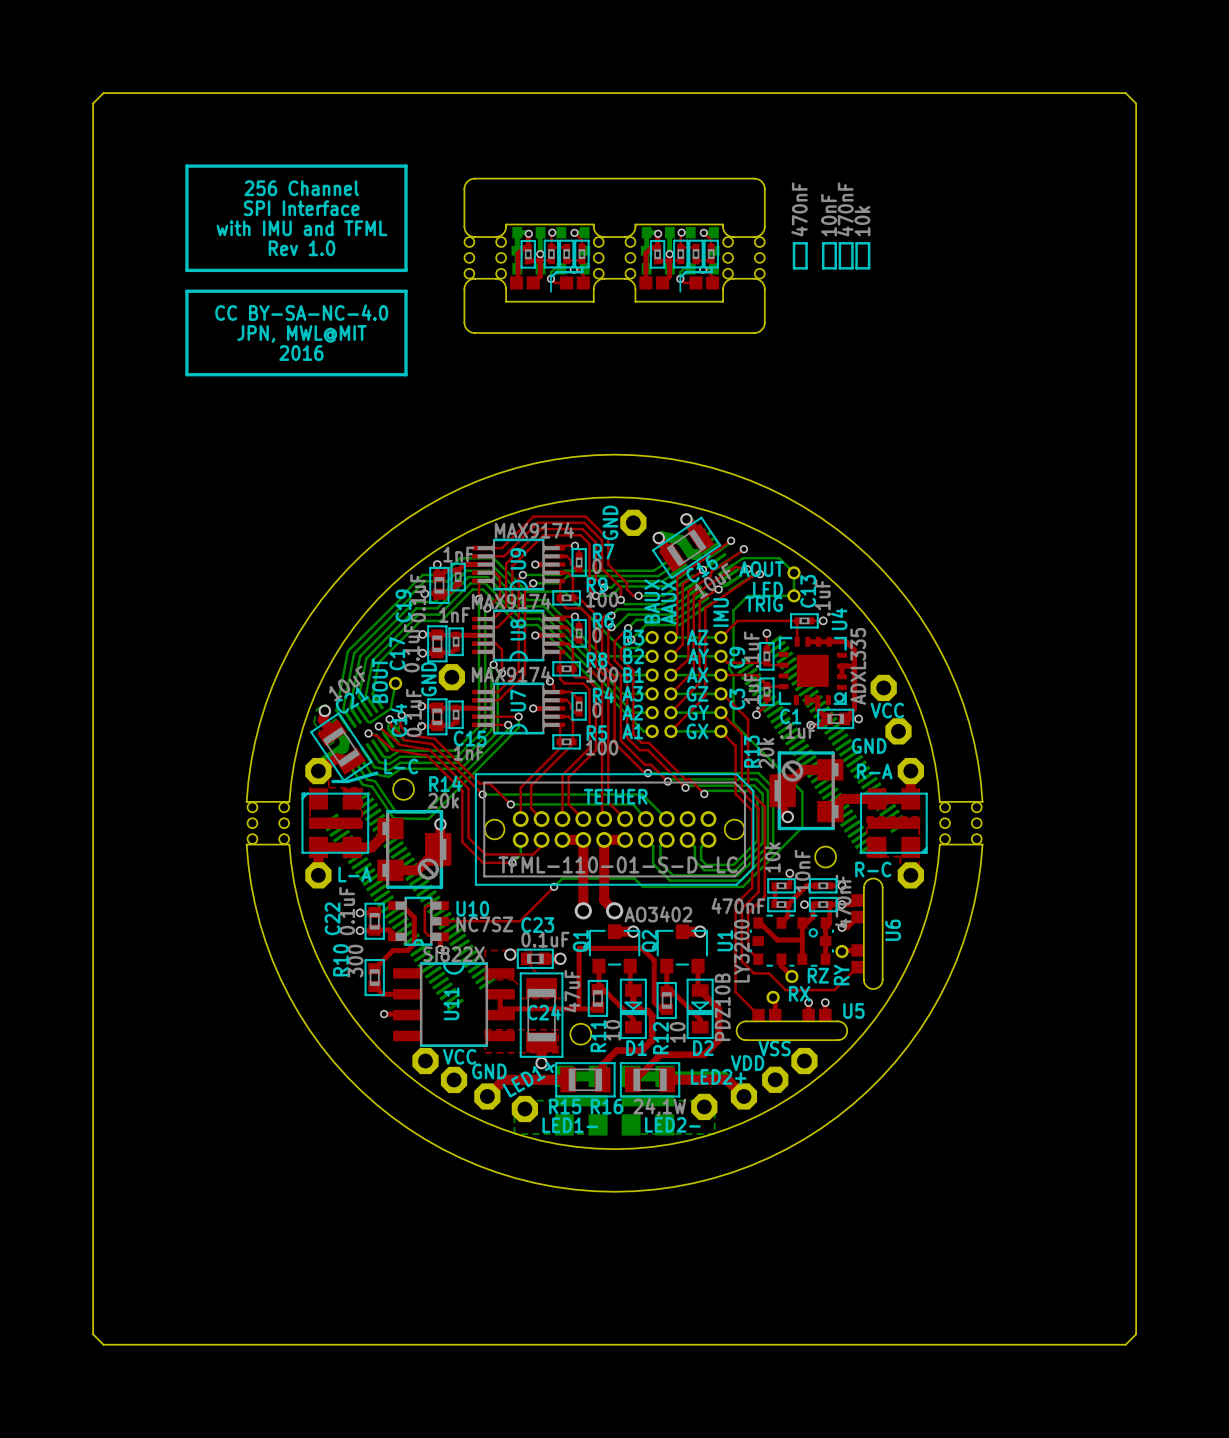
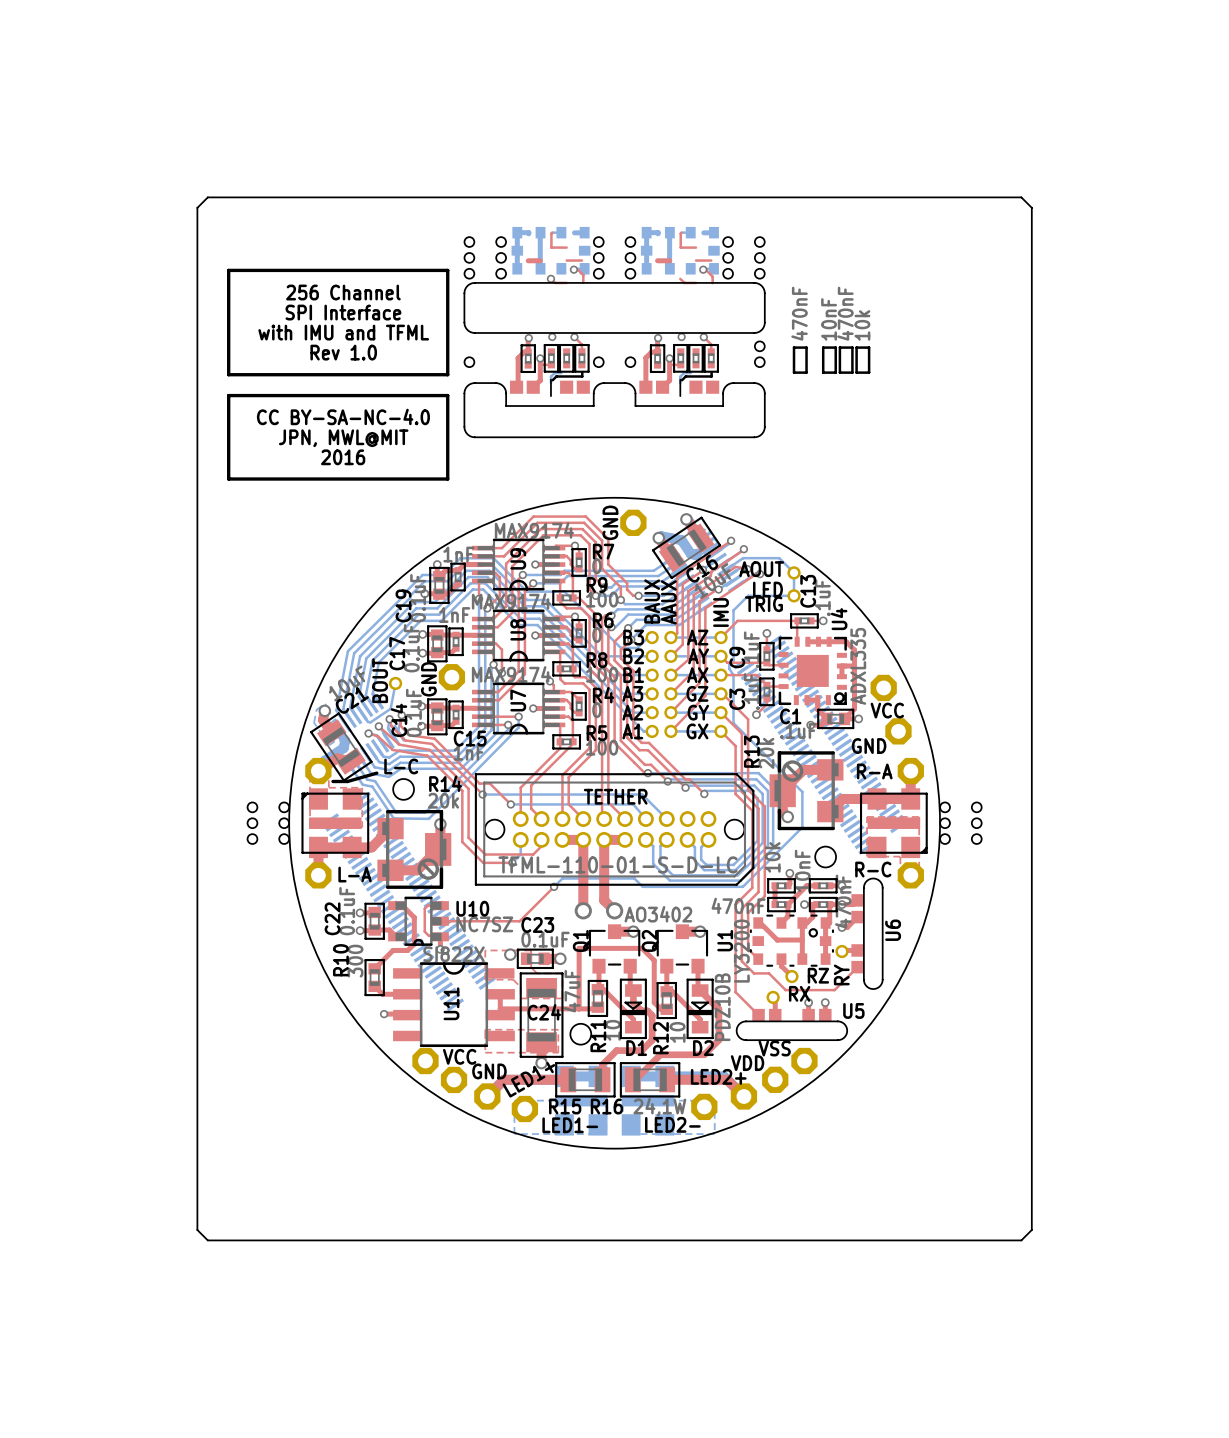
board edge: (103, 93) (93, 103) (93, 1334) (103, 1344) (1125, 1344) (1136, 1334) (1136, 103) (1125, 93) (103, 93) -> (207, 197) (197, 207) (197, 1229) (207, 1240) (1021, 1240) (1031, 1229) (1031, 207) (1021, 197) (207, 197)
board edge: (474, 178) (755, 178) (761, 181) (764, 187) (764, 227) (762, 232) (757, 236) (733, 237) (725, 232) (723, 224) (635, 224) (634, 231) (629, 236) (604, 237) (595, 232) (593, 224) (506, 224) (504, 231) (499, 236) (473, 236) (467, 233) (464, 227) (464, 189) (467, 181) (474, 178) -> none
text position: 256 Channel (301, 188) -> 256 Channel (343, 292)
text position: SPI Interface (301, 208) -> SPI Interface (343, 312)
text position: with IMU and TFML (301, 228) -> with IMU and TFML (343, 332)
via: (552, 232) -> none
top track: (574, 232) (581, 240) (581, 247) -> (574, 337) (581, 344) (581, 351)
via: (574, 232) -> none
via: (681, 232) -> none
top track: (703, 232) (711, 240) (711, 247) -> (703, 337) (711, 344) (711, 351)
via: (703, 232) -> none
top track: (528, 233) (528, 247) (524, 247) (518, 253) (516, 282) -> (528, 338) (528, 352) (524, 352) (518, 358) (516, 387)
via: (528, 233) -> none
top track: (658, 233) (657, 247) (651, 247) (645, 253) (645, 282) -> (658, 338) (657, 352) (651, 352) (645, 357) (645, 387)
via: (658, 233) -> none
line: (794, 243) (794, 268) (806, 268) (806, 243) (794, 243) -> (794, 347) (794, 372) (806, 372) (806, 347) (794, 347)
line: (823, 243) (835, 243) (835, 268) (823, 268) (823, 243) -> (823, 347) (835, 347) (835, 372) (823, 372) (823, 347)
line: (839, 243) (852, 243) (852, 268) (839, 268) (839, 243) -> (839, 347) (852, 347) (852, 372) (839, 372) (839, 347)
line: (856, 243) (869, 243) (869, 268) (856, 268) (856, 243) -> (856, 347) (869, 347) (869, 372) (856, 372) (856, 347)
text position: Rev 1.0 (301, 248) -> Rev 1.0 (343, 352)
part: (528, 254) -> none
via: (540, 254) -> none
part: (551, 254) -> none
part: (566, 254) -> none
part: (581, 254) -> none
part: 470nF (657, 254) -> none
via: (669, 254) -> none
part position: (680, 254) -> (680, 358)
part: 470nF (696, 254) -> none
part position: (711, 254) -> (711, 358)
top track: (551, 260) (540, 260) (540, 254) (540, 276) (533, 282) -> (551, 364) (540, 364) (540, 358) (540, 380) (533, 387)
top track: (680, 260) (669, 260) (669, 254) (669, 276) (662, 282) -> (680, 364) (669, 364) (669, 358) (669, 380) (662, 387)
bottom track: (561, 268) (554, 268) (550, 272) (550, 278) -> (561, 373) (554, 373) (550, 376) (550, 383)
line: (582, 268) (582, 272) (557, 272) -> (582, 372) (582, 376) (557, 376)
bottom track: (690, 268) (683, 268) (680, 272) (680, 278) -> (690, 373) (683, 373) (680, 376) (680, 383)
line: (711, 268) (711, 272) (686, 272) -> (711, 372) (711, 376) (686, 376)
line: (228, 270) (186, 270) (186, 166) (406, 166) (406, 270) -> (228, 270) (228, 374)
line: (556, 272) (552, 275) -> (556, 376) (552, 380)
line: (686, 272) (681, 275) -> (686, 376) (681, 380)
line: (550, 275) (550, 291) -> (550, 379) (550, 396)
line: (680, 275) (680, 291) -> (680, 379) (680, 396)
via: (680, 278) -> none
part: (516, 282) -> none
part: (533, 282) -> none
part: (566, 282) -> none
part: (583, 282) -> none
part: (645, 282) -> none
part: (662, 282) -> none
part: (695, 282) -> none
part: (712, 282) -> none
board edge: (464, 293) (466, 282) (474, 278) (497, 278) (502, 280) (506, 287) (506, 301) (593, 301) (594, 285) (597, 280) (604, 278) (626, 278) (631, 280) (635, 287) (635, 301) (723, 301) (723, 285) (727, 280) (733, 278) (758, 279) (764, 285) (764, 293) -> (464, 293) (467, 285) (474, 282) (754, 282) (761, 285) (764, 293)
text position: CC BY-SA-NC-4.0 (301, 312) -> CC BY-SA-NC-4.0 (343, 416)
text position: JPN, MWL@MIT (301, 333) -> JPN, MWL@MIT (343, 438)
via: none -> (552, 336)
via: none -> (681, 336)
via: none -> (574, 337)
via: none -> (703, 337)
via: none -> (528, 338)
via: none -> (658, 338)
hole: none -> (759, 346)
text position: 2016 (301, 353) -> 2016 (343, 457)
part: none -> (528, 358)
via: none -> (540, 358)
part: none -> (551, 358)
part: none -> (566, 358)
part: none -> (581, 358)
part: none -> 470nF (657, 358)
via: none -> (669, 358)
part: none -> 470nF (696, 358)
hole: none -> (469, 362)
hole: none -> (598, 362)
hole: none -> (630, 362)
hole: none -> (759, 362)
line: (228, 374) (186, 374) (186, 291) (406, 291) (406, 374) -> (406, 270) (447, 270) (447, 374) (406, 374)
board edge: none -> (474, 383) (497, 383) (502, 385) (506, 392) (506, 406) (593, 406) (594, 389) (597, 385) (604, 383) (626, 383) (631, 385) (635, 392) (635, 406) (723, 406) (723, 392) (727, 385) (732, 383) (755, 383) (760, 385) (764, 390) (764, 428) (760, 435) (754, 437) (473, 437) (468, 435) (464, 429) (464, 393) (467, 386) (474, 383)
part: none -> (516, 387)
part: none -> (533, 387)
part: none -> (566, 387)
part: none -> (583, 387)
part: none -> (645, 387)
part: none -> (662, 387)
part: none -> (695, 387)
part: none -> (712, 387)
line: none -> (228, 395) (228, 479) (447, 479) (447, 395) (228, 395)
round board edge: none -> [288, 497, 941, 1149]
board edge: (246, 801) (289, 801) (297, 745) (309, 709) (324, 675) (343, 642) (365, 612) (405, 572) (452, 540) (503, 516) (558, 502) (614, 497) (670, 502) (725, 516) (776, 540) (823, 572) (863, 612) (886, 642) (905, 675) (920, 709) (931, 745) (939, 801) (982, 801) (974, 742) (963, 704) (948, 667) (919, 615) (894, 584) (867, 555) (837, 529) (804, 507) (750, 480) (712, 468) (674, 459) (614, 454) (555, 459) (516, 468) (478, 480) (425, 507) (392, 529) (361, 555) (334, 584) (310, 615) (280, 667) (265, 704) (254, 742) (246, 801) -> none
board edge: (246, 844) (289, 844) (297, 900) (309, 936) (324, 971) (343, 1003) (365, 1033) (405, 1073) (452, 1105) (503, 1129) (558, 1144) (614, 1149) (670, 1144) (725, 1129) (776, 1105) (823, 1073) (863, 1033) (886, 1003) (905, 971) (920, 936) (931, 900) (939, 844) (982, 844) (974, 903) (963, 941) (948, 978) (919, 1030) (894, 1062) (867, 1091) (837, 1116) (804, 1139) (750, 1165) (712, 1178) (674, 1186) (614, 1191) (555, 1186) (516, 1178) (478, 1165) (425, 1139) (392, 1116) (361, 1091) (334, 1062) (310, 1030) (280, 978) (265, 941) (254, 903) (246, 844) -> none

